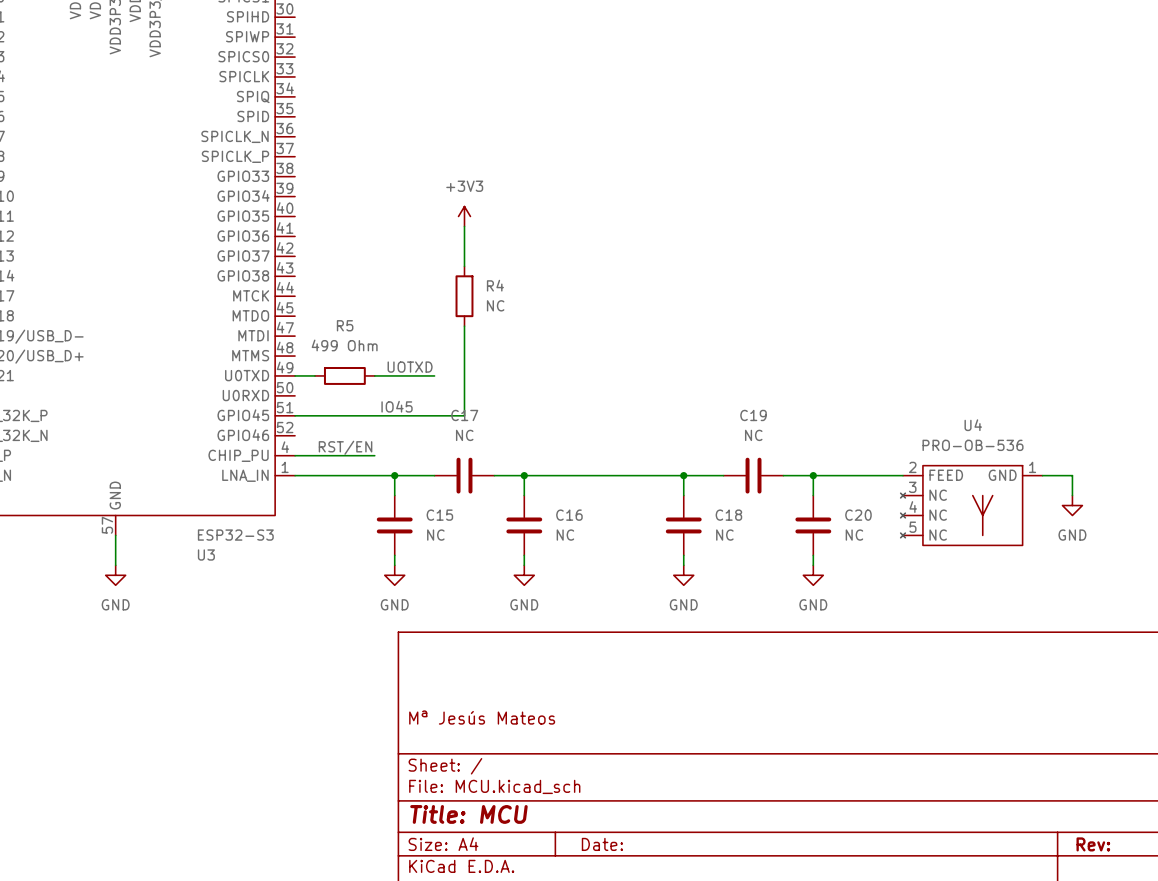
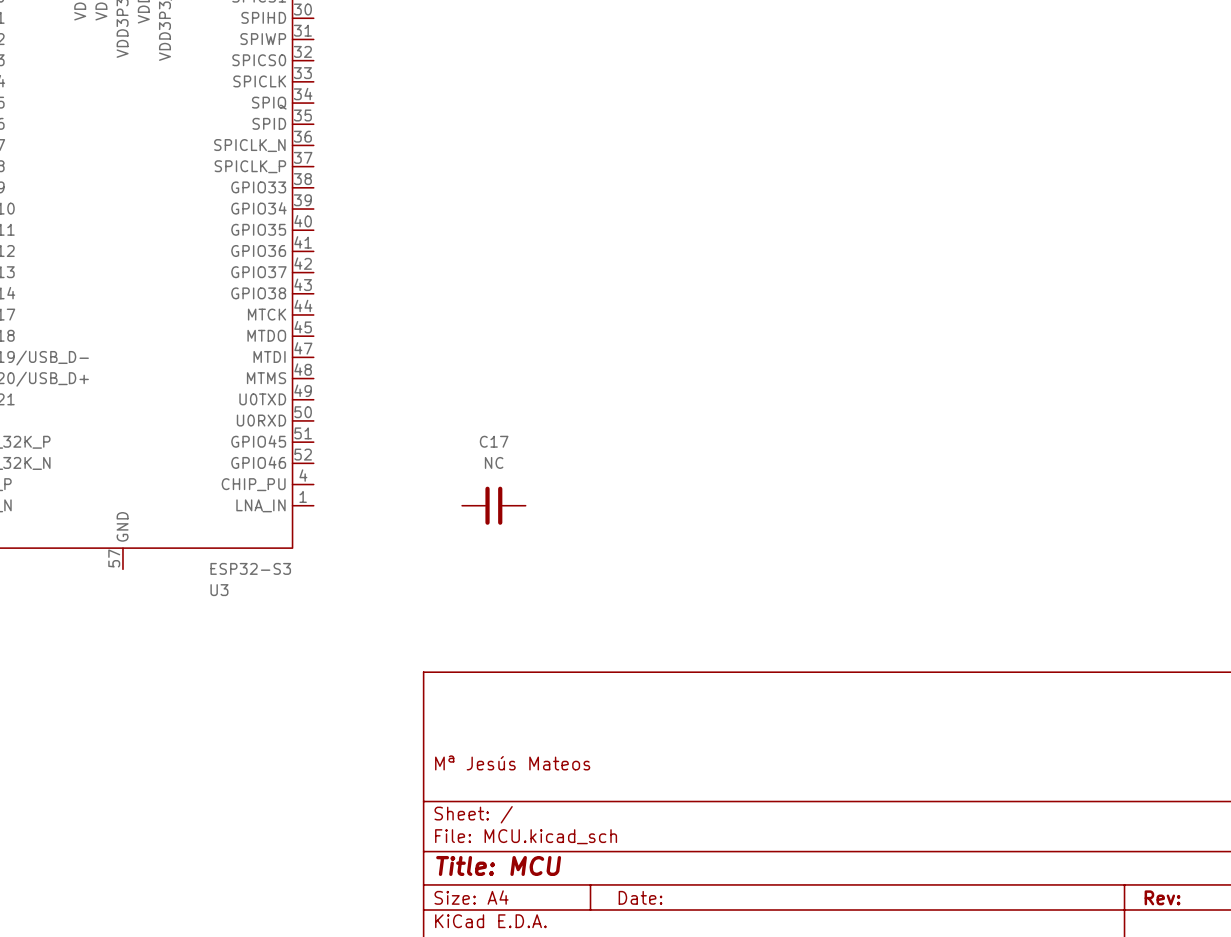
power symbol: +3V3 (464, 216) -> none
wire: (464, 226) (464, 266) -> none
R4: NC (464, 296) -> none
wire: (464, 326) (464, 415) (295, 415) -> none
label: UOTXD (410, 367) -> none
wire: (295, 375) (314, 375) -> none
R5: 499 Ohm (344, 375) -> none
wire: (374, 375) (434, 375) -> none
label: IO45 (397, 406) -> none
label: RST/EN (345, 447) -> none
wire: (295, 455) (374, 455) -> none
wire: (295, 475) (434, 475) -> none
wire: (394, 475) (394, 495) -> none
junction: (394, 475) -> none
wire: (494, 475) (723, 475) -> none
wire: (524, 475) (524, 495) -> none
junction: (524, 475) -> none
wire: (683, 475) (683, 495) -> none
junction: (683, 475) -> none
C19: NC (753, 475) -> none
wire: (783, 475) (903, 475) -> none
wire: (813, 475) (813, 495) -> none
junction: (813, 475) -> none
wire: (1042, 475) (1072, 475) (1072, 495) -> none
U4: PRO-OB-536 (971, 505) -> none
power symbol: GND (1072, 505) -> none
C15: NC (394, 525) -> none
C16: NC (524, 525) -> none
C18: NC (683, 525) -> none
C20: NC (813, 525) -> none
wire: (115, 535) (115, 565) -> none
wire: (394, 555) (394, 565) -> none
wire: (524, 555) (524, 565) -> none
wire: (683, 555) (683, 565) -> none
wire: (813, 555) (813, 565) -> none
power symbol: GND (115, 575) -> none
power symbol: GND (394, 575) -> none
power symbol: GND (524, 575) -> none
power symbol: GND (683, 575) -> none
power symbol: GND (813, 575) -> none

